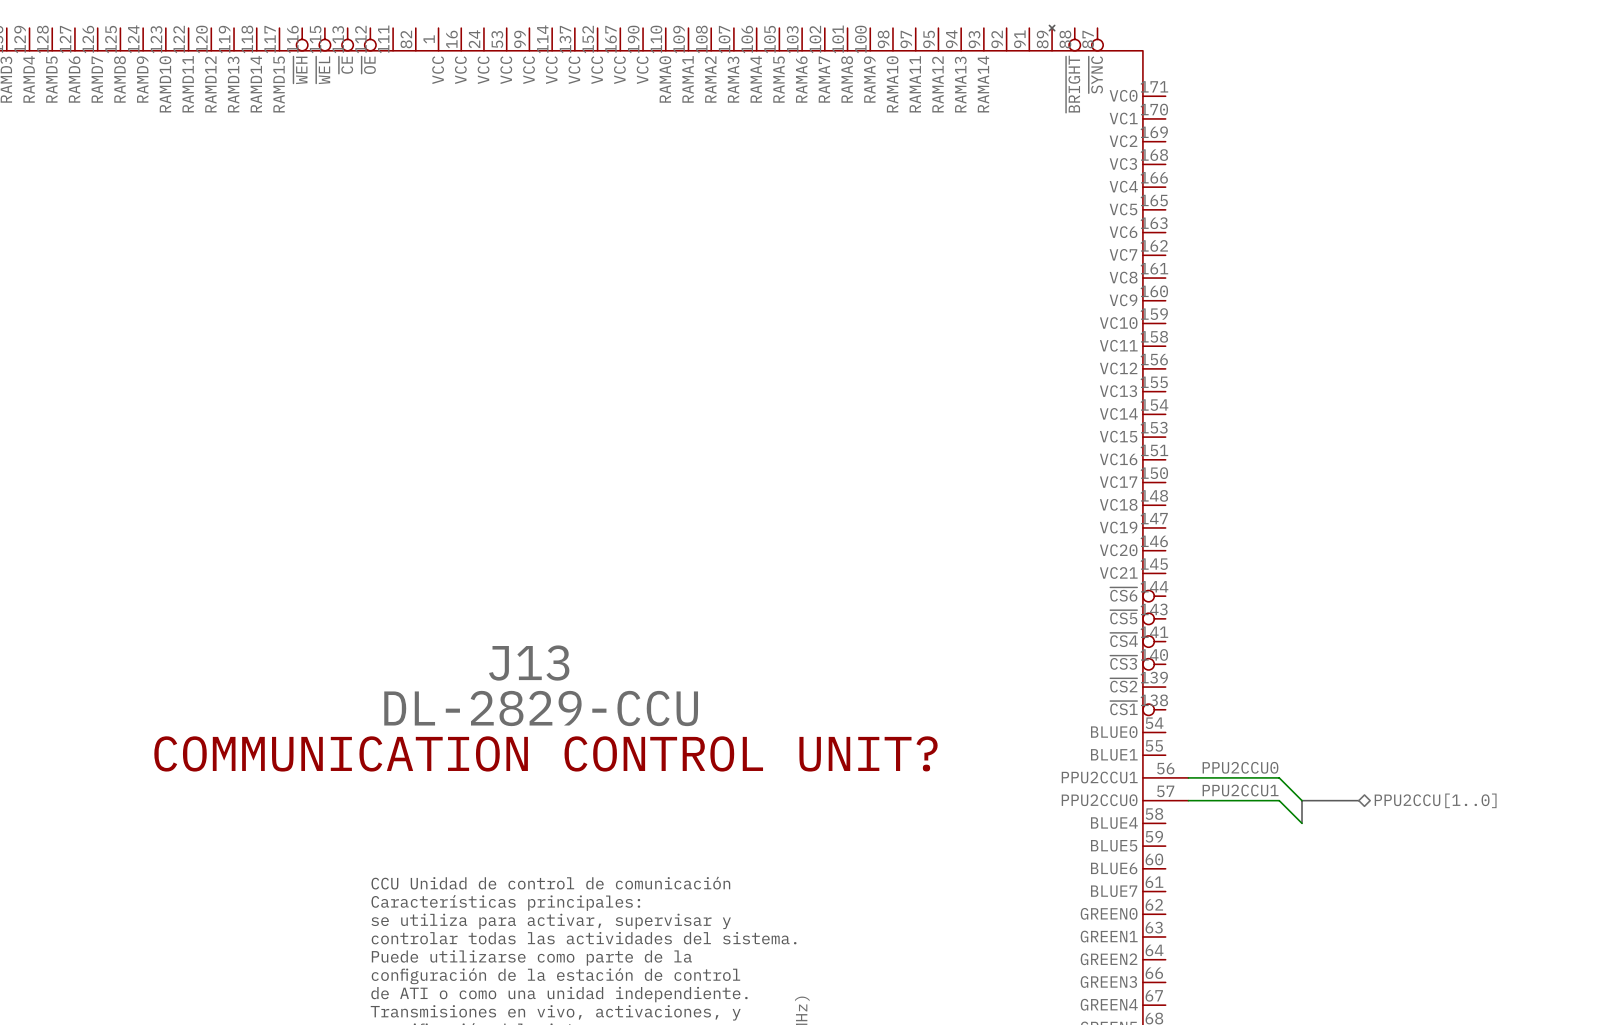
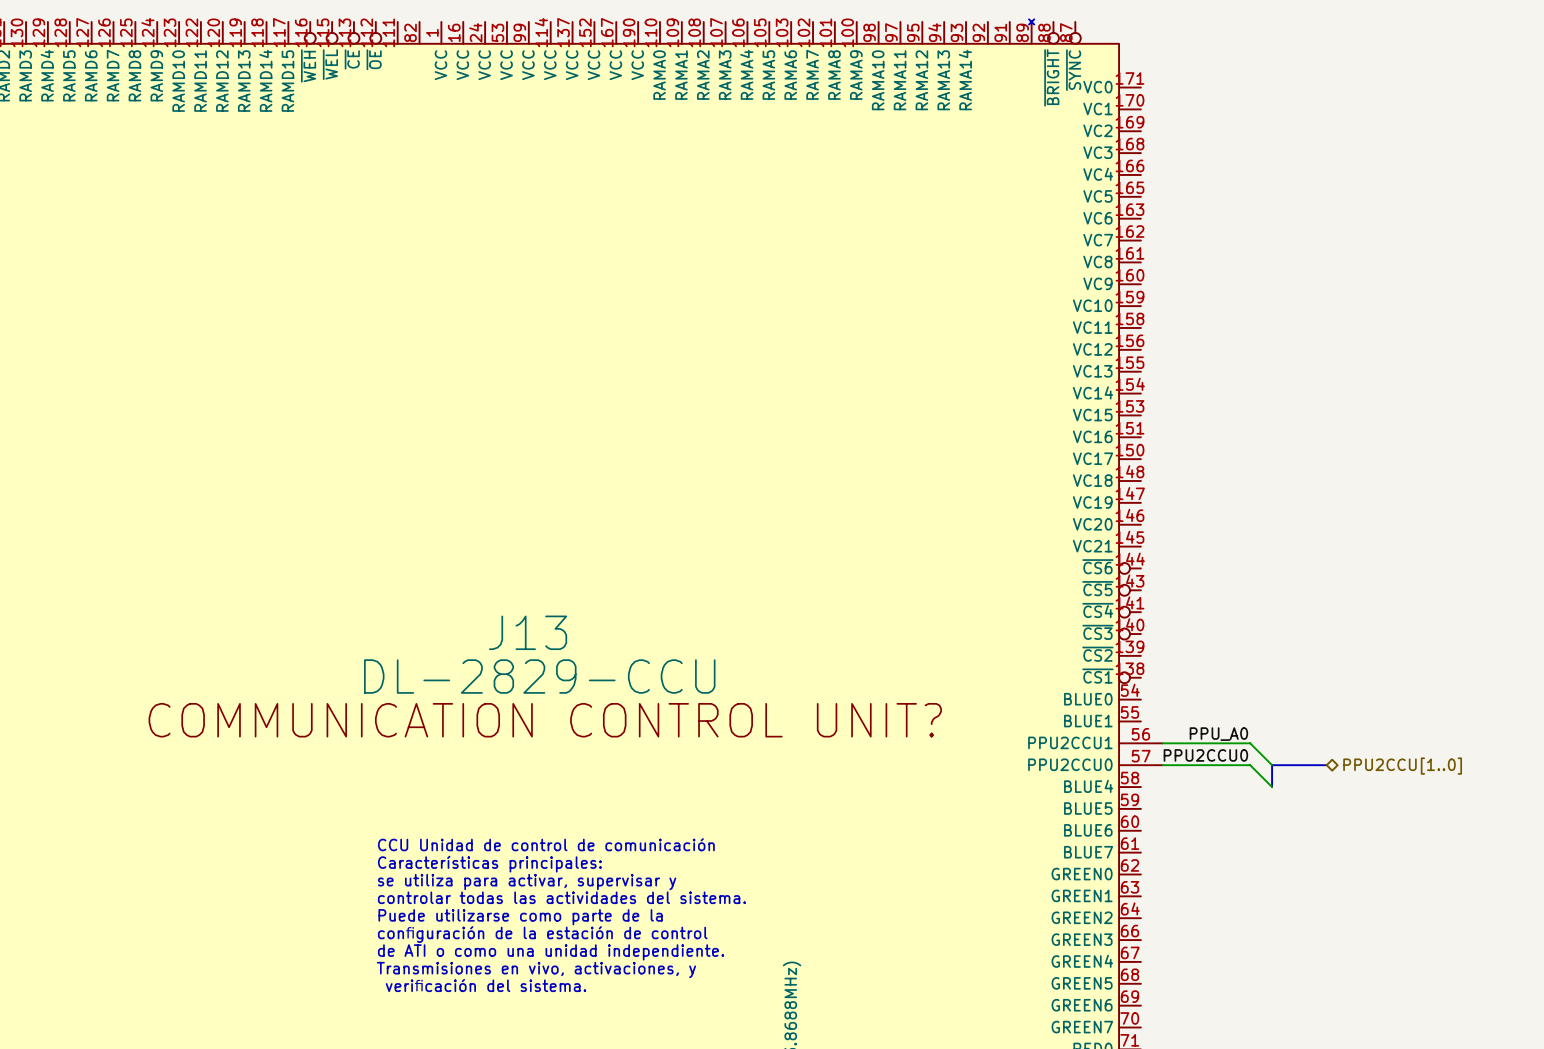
label: PPU2CCU0 (1240, 767) -> PPU_A0 (1218, 734)
label: PPU2CCU1 (1240, 790) -> PPU2CCU0 (1205, 755)

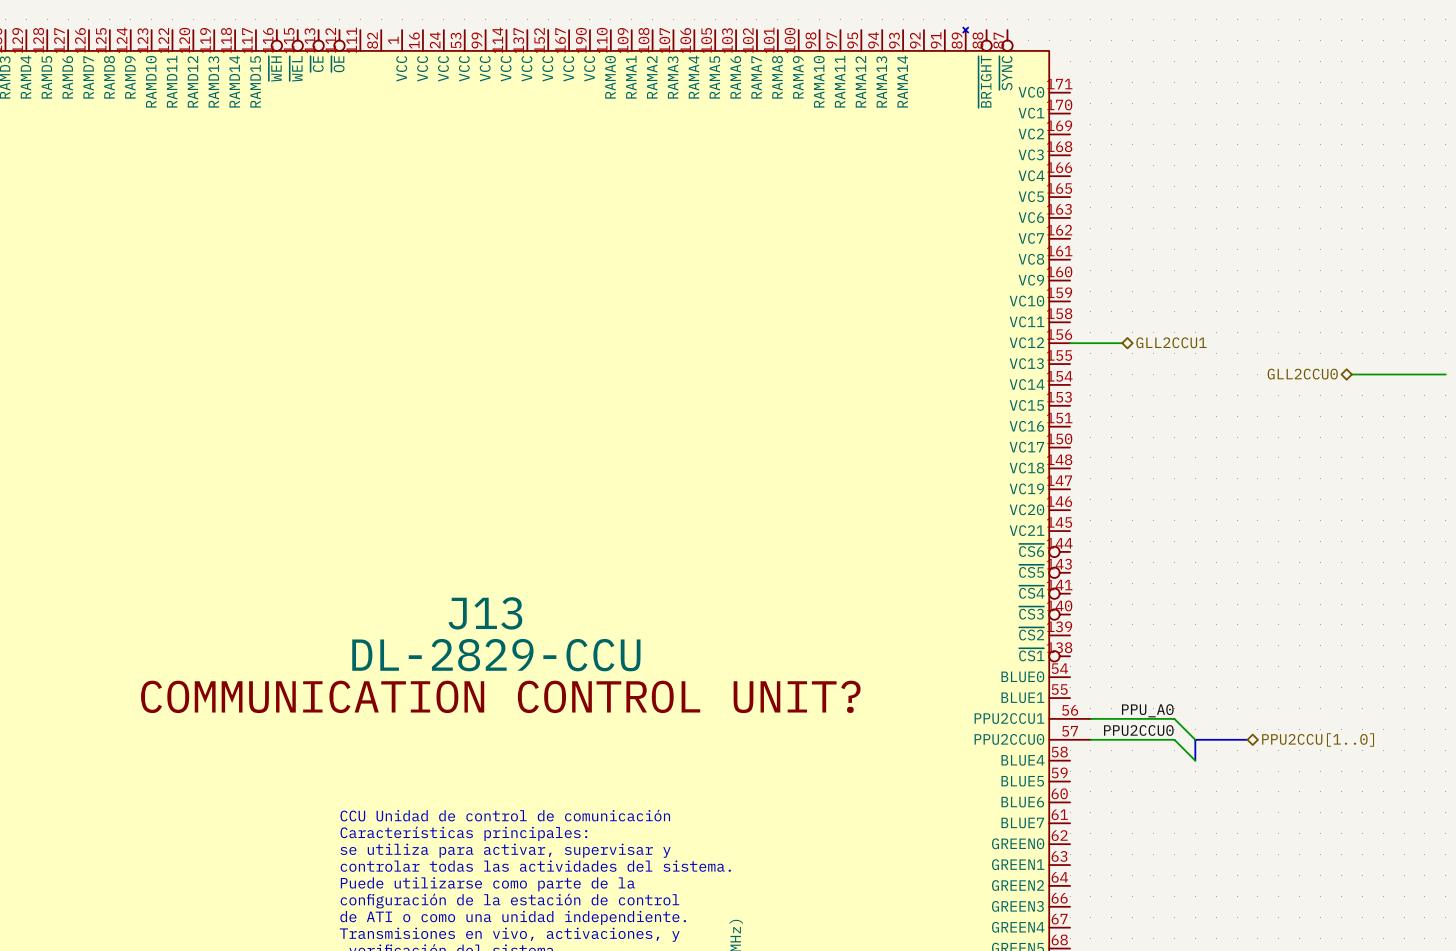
wire: none -> (1070, 343) (1122, 343)
hierarchical label: none -> GLL2CCU1 (1171, 342)
hierarchical label: none -> GLL2CCU0 (1302, 374)
wire: none -> (1351, 374) (1445, 374)

